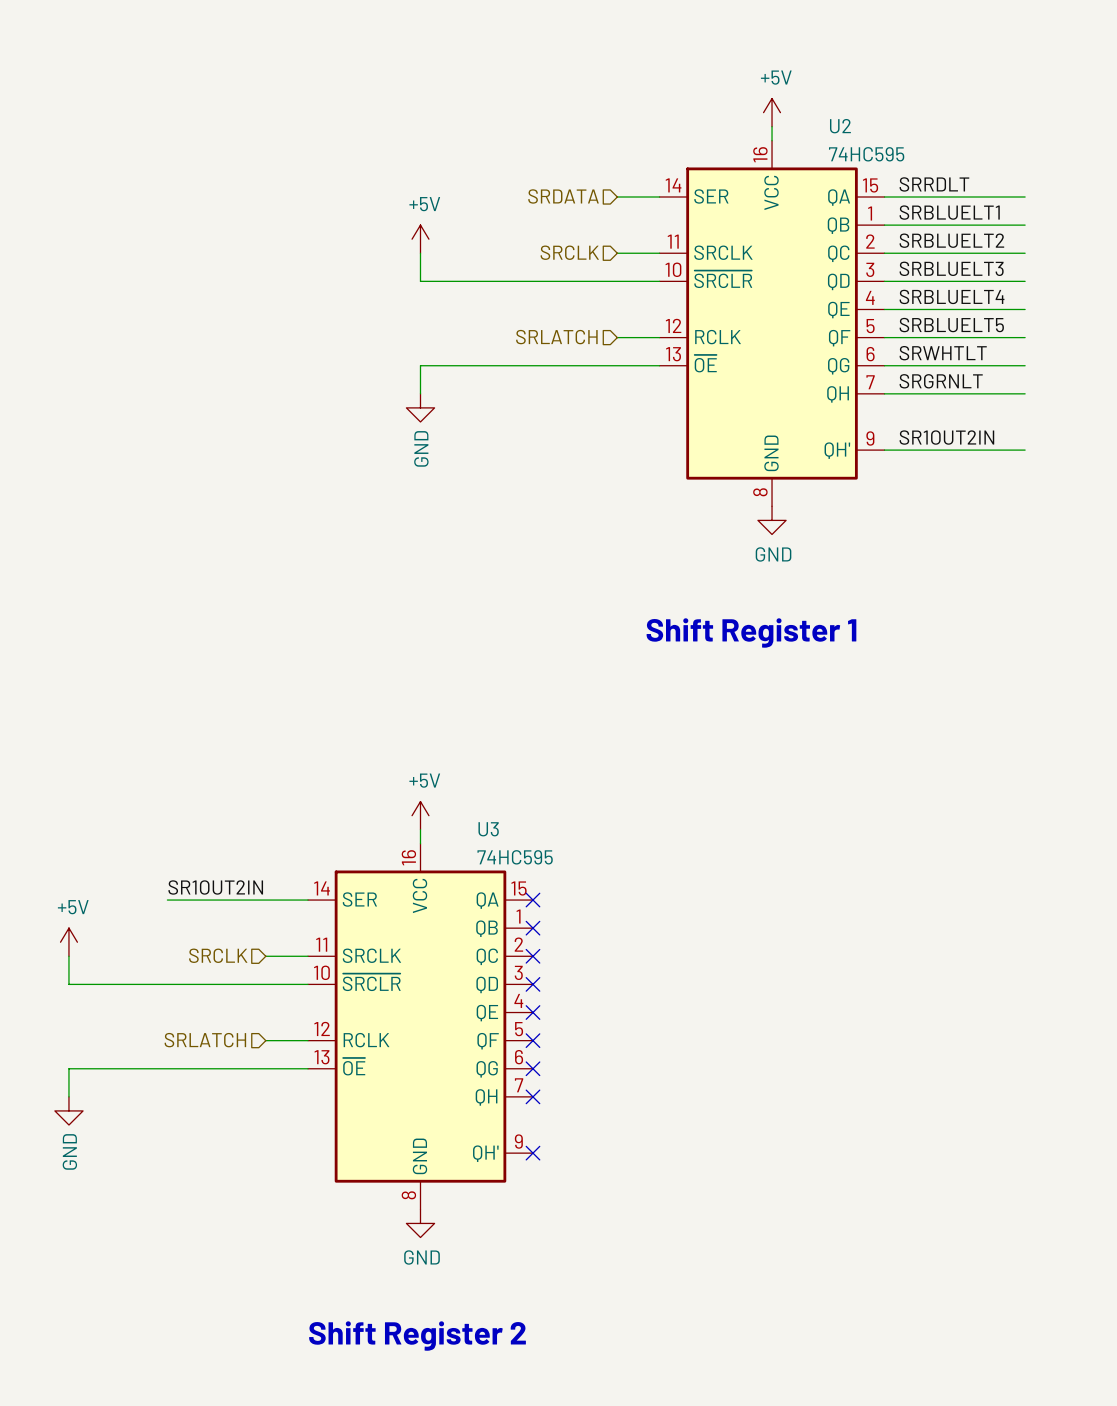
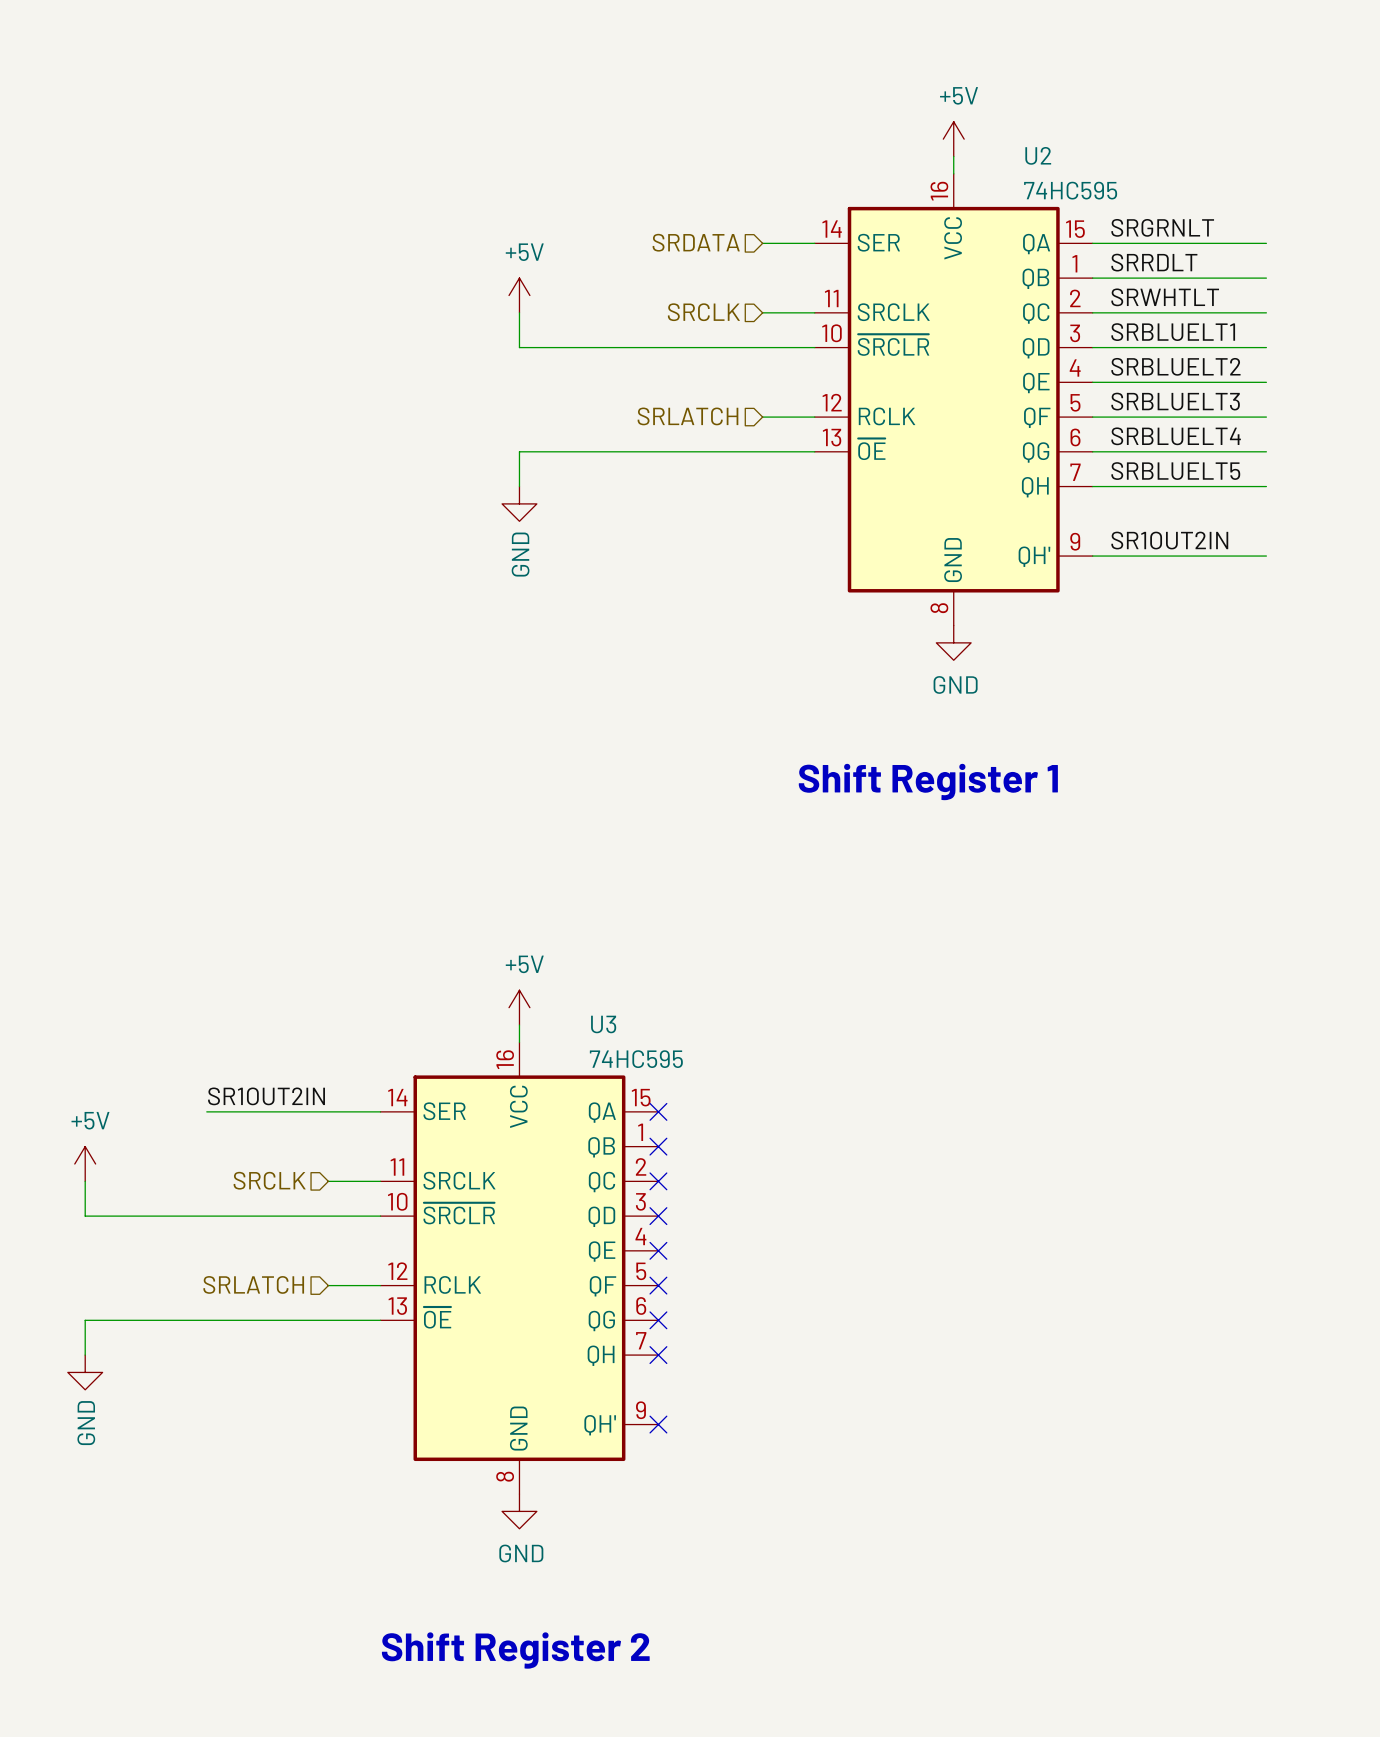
label: SRRDLT (934, 184) -> SRGRNLT (1162, 227)
label: SRBLUELT1 (949, 212) -> SRRDLT (1154, 262)
label: SRBLUELT2 (951, 240) -> SRWHTLT (1165, 297)
label: SRBLUELT3 (951, 268) -> SRBLUELT1 (1173, 332)
label: SRBLUELT4 (952, 296) -> SRBLUELT2 (1175, 366)
label: SRBLUELT5 (951, 325) -> SRBLUELT3 (1175, 401)
label: SRWHTLT (943, 353) -> SRBLUELT4 (1176, 436)
label: SRGRNLT (941, 381) -> SRBLUELT5 (1175, 471)

